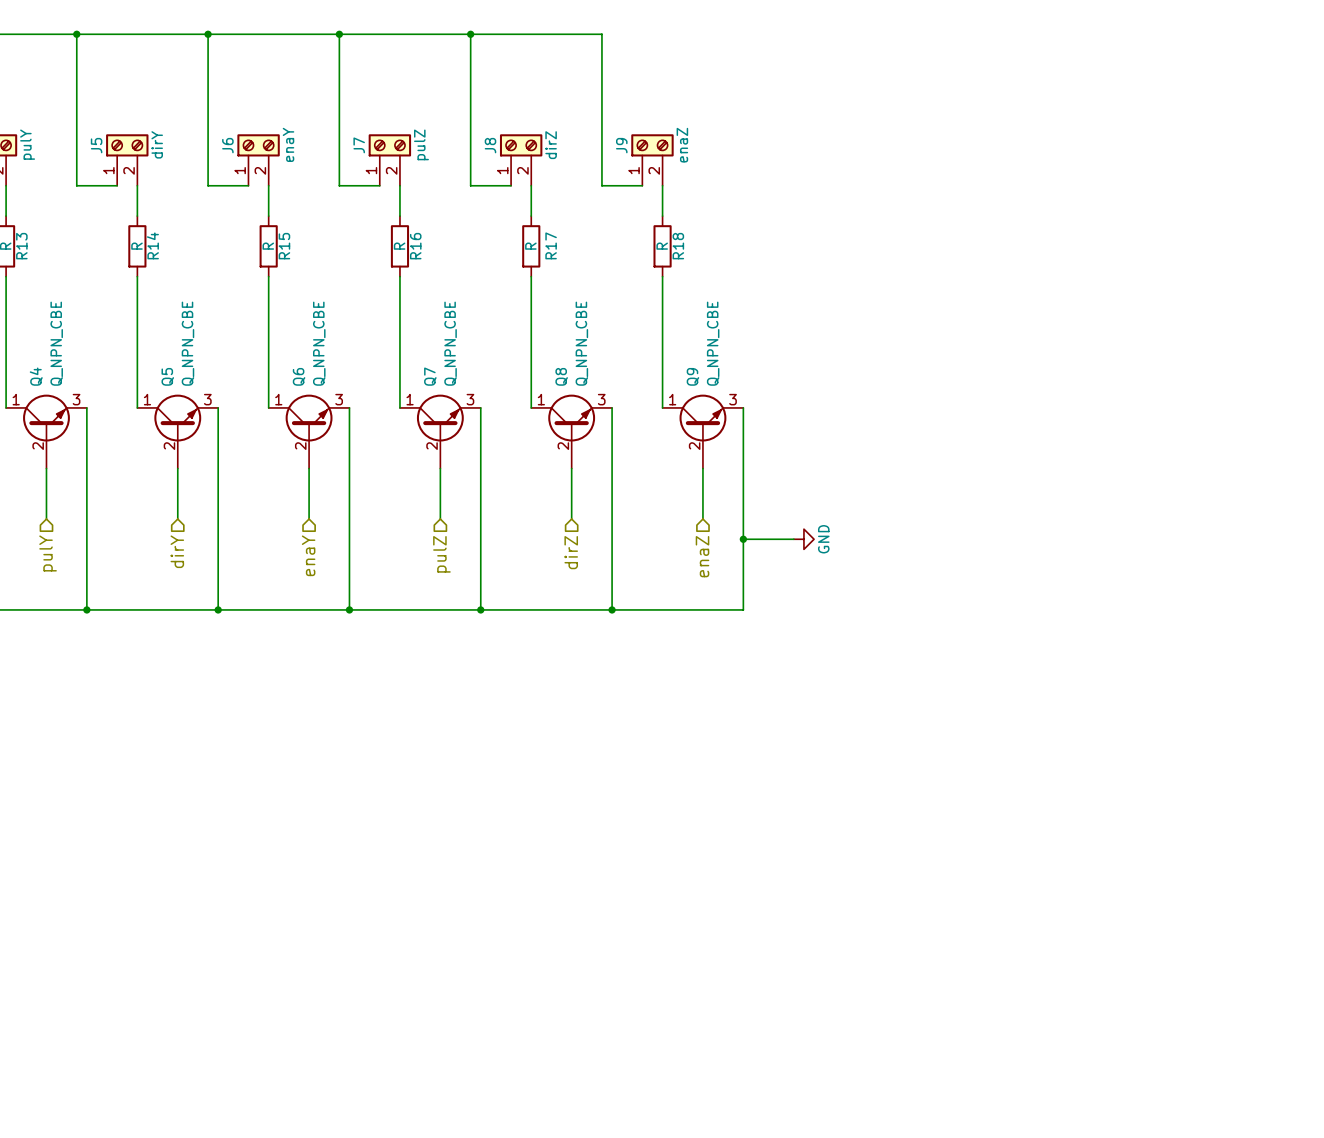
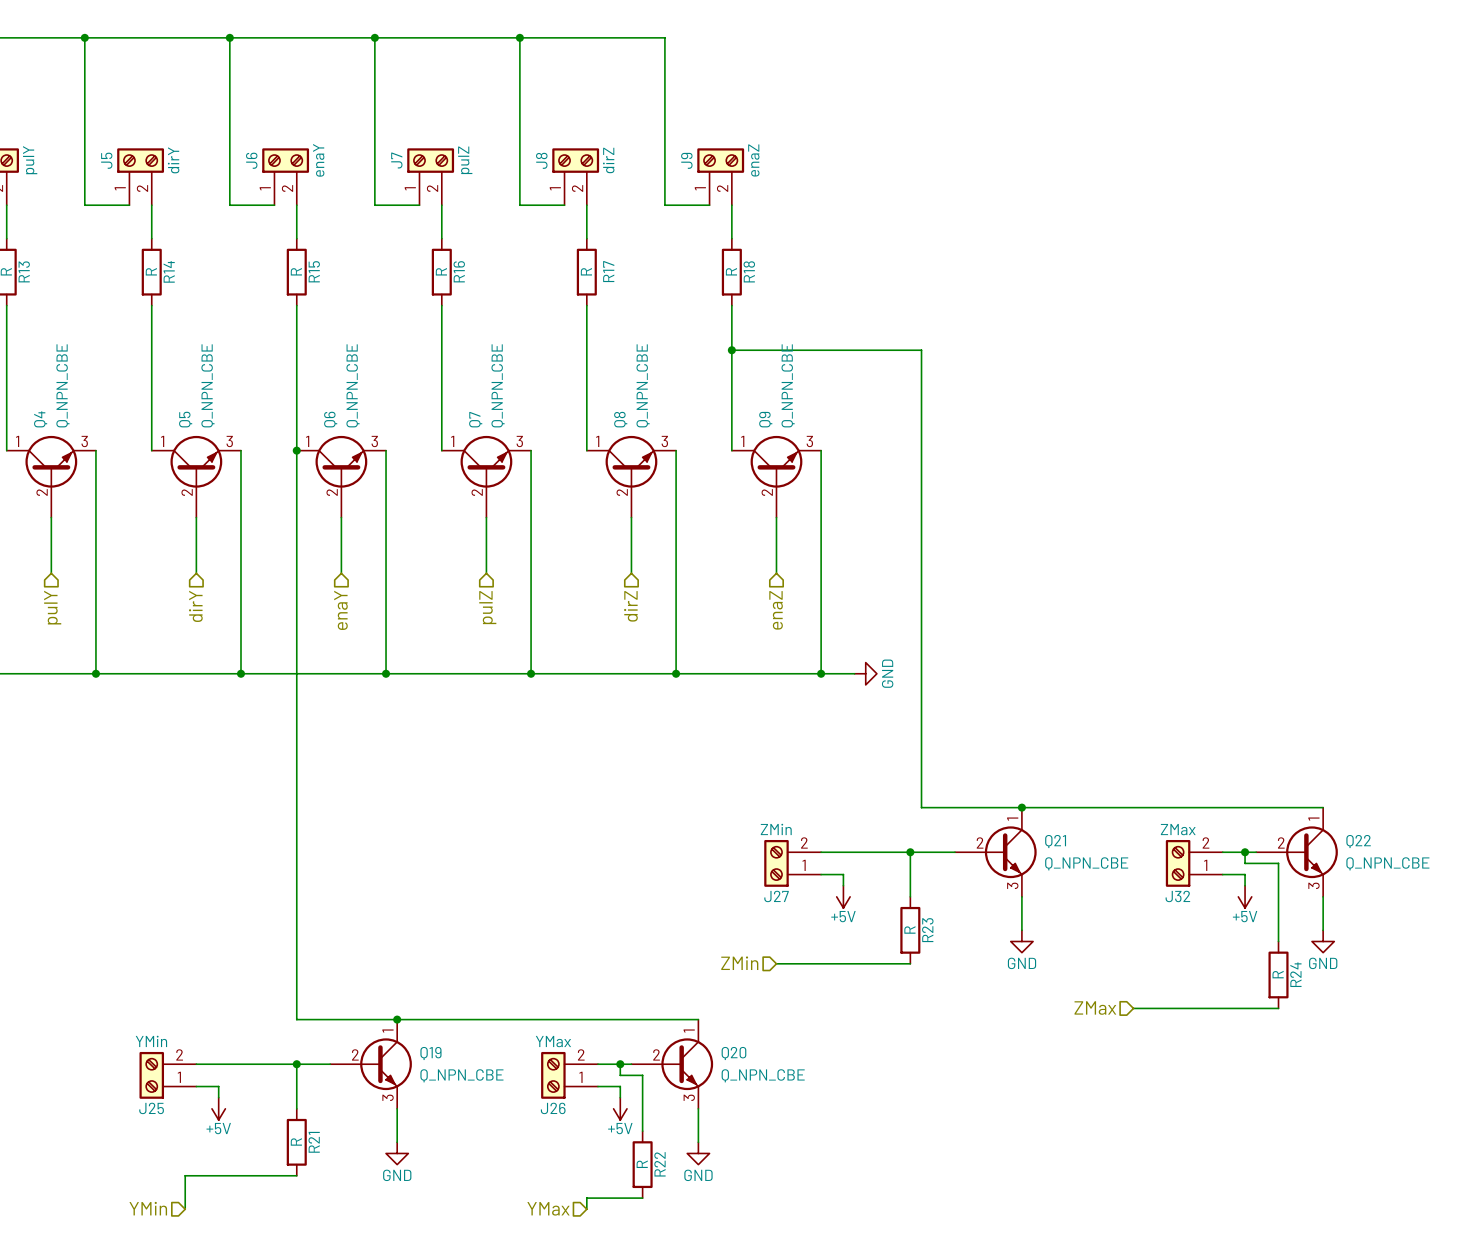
wire: none -> (731, 350) (921, 350) (921, 807) (1323, 807)
junction: none -> (731, 350)
wire: none -> (296, 450) (296, 1019) (698, 1019)
junction: none -> (296, 450)
wire: (743, 539) (793, 539) -> none
junction: (743, 539) -> none
power symbol position: GND (803, 539) -> GND (865, 673)
wire: none -> (821, 673) (854, 673)
junction: none -> (821, 673)
junction: none -> (1021, 807)
wire: none -> (821, 852) (954, 852)
wire: none -> (910, 852) (910, 896)
junction: none -> (910, 852)
Q21: none -> Q_NPN_CBE (995, 852)
wire: none -> (1222, 852) (1256, 852)
wire: none -> (1245, 852) (1245, 863) (1278, 863) (1278, 941)
junction: none -> (1245, 852)
Q22: none -> Q_NPN_CBE (1297, 852)
J27: none -> ZMin (792, 863)
J32: none -> ZMax (1194, 863)
wire: none -> (821, 874) (843, 874) (843, 885)
wire: none -> (1222, 874) (1245, 874) (1245, 885)
power symbol: none -> +5V (843, 896)
wire: none -> (1021, 896) (1021, 930)
power symbol: none -> +5V (1245, 896)
wire: none -> (1323, 896) (1323, 930)
R23: none -> R (910, 930)
power symbol: none -> GND (1021, 941)
power symbol: none -> GND (1323, 941)
hierarchical label: none -> ZMin (739, 963)
wire: none -> (776, 963) (910, 963)
R24: none -> R (1278, 974)
hierarchical label: none -> ZMax (1095, 1008)
wire: none -> (1133, 1008) (1278, 1008)
junction: none -> (397, 1019)
wire: none -> (196, 1064) (330, 1064)
wire: none -> (296, 1064) (296, 1108)
junction: none -> (296, 1064)
Q19: none -> Q_NPN_CBE (371, 1064)
wire: none -> (597, 1064) (631, 1064)
wire: none -> (620, 1064) (620, 1075) (642, 1075) (642, 1131)
junction: none -> (620, 1064)
Q20: none -> Q_NPN_CBE (672, 1064)
J25: none -> YMin (167, 1075)
J26: none -> YMax (569, 1075)
wire: none -> (196, 1086) (218, 1086) (218, 1097)
wire: none -> (597, 1086) (620, 1086) (620, 1097)
power symbol: none -> +5V (218, 1108)
wire: none -> (397, 1108) (397, 1142)
power symbol: none -> +5V (620, 1108)
wire: none -> (698, 1108) (698, 1142)
R21: none -> R (296, 1142)
power symbol: none -> GND (397, 1153)
power symbol: none -> GND (698, 1153)
R22: none -> R (642, 1164)
wire: none -> (296, 1175) (185, 1175) (185, 1209)
wire: none -> (642, 1198) (586, 1198) (586, 1209)
hierarchical label: none -> YMin (148, 1208)
hierarchical label: none -> YMax (548, 1208)

